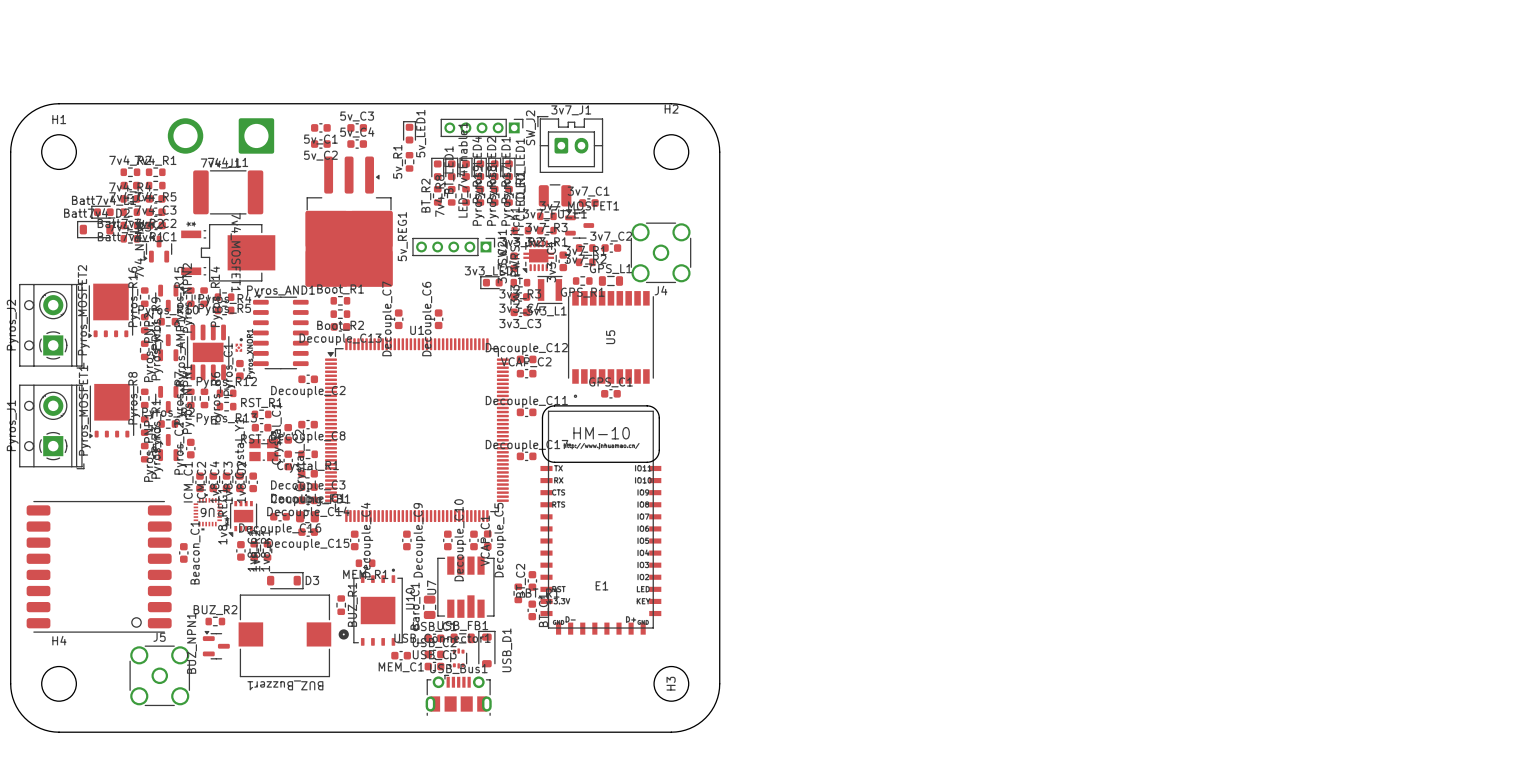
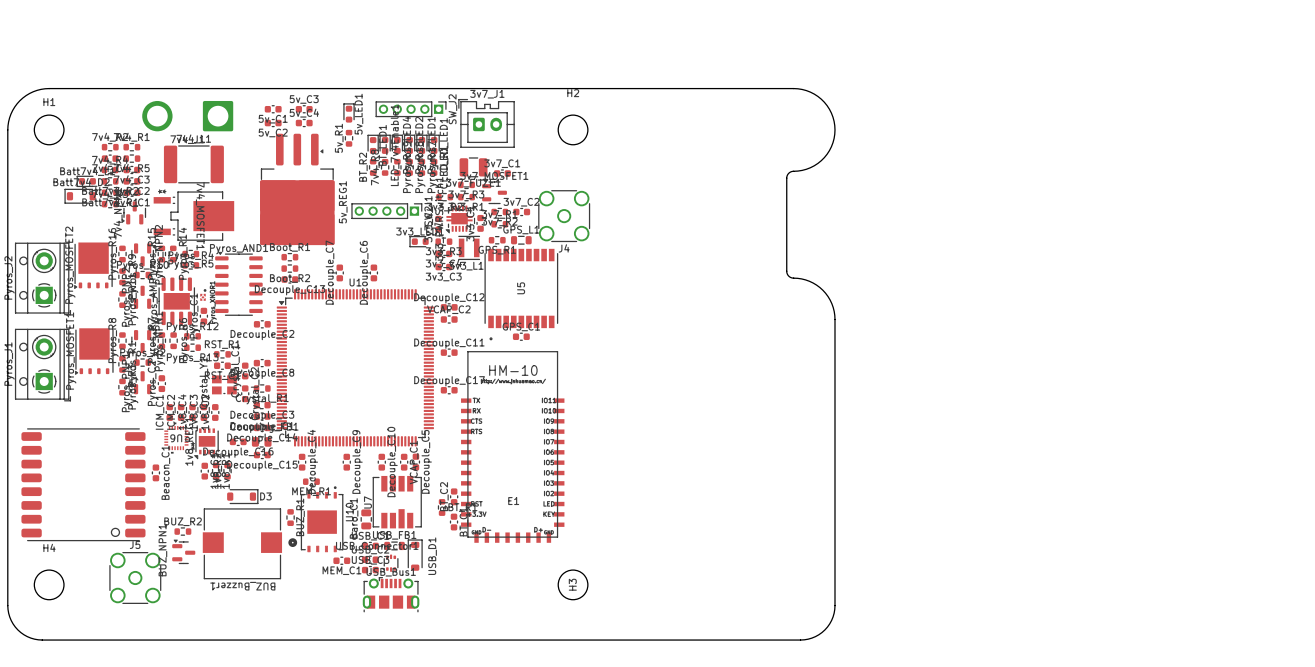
board edge: (671, 103) (689, 107) (705, 117) (714, 129) (719, 147) (719, 683) (716, 702) (702, 721) (685, 730) (671, 732) (54, 731) (40, 728) (24, 718) (14, 702) (10, 683) -> (573, 88) (797, 88) (817, 96) (831, 113) (834, 134) (827, 154) (814, 165) (790, 171) (786, 178) (787, 273) (790, 277) (805, 279) (819, 287) (830, 300) (834, 315) (834, 605) (831, 620) (822, 632) (811, 638) (800, 640) (38, 639) (23, 634) (13, 623) (8, 609) (7, 584)
board edge: (554, 405) (651, 406) (656, 410) (659, 416) (658, 454) (653, 460) (647, 462) (549, 461) (544, 457) (542, 451) (542, 416) (546, 409) (554, 405) -> none

